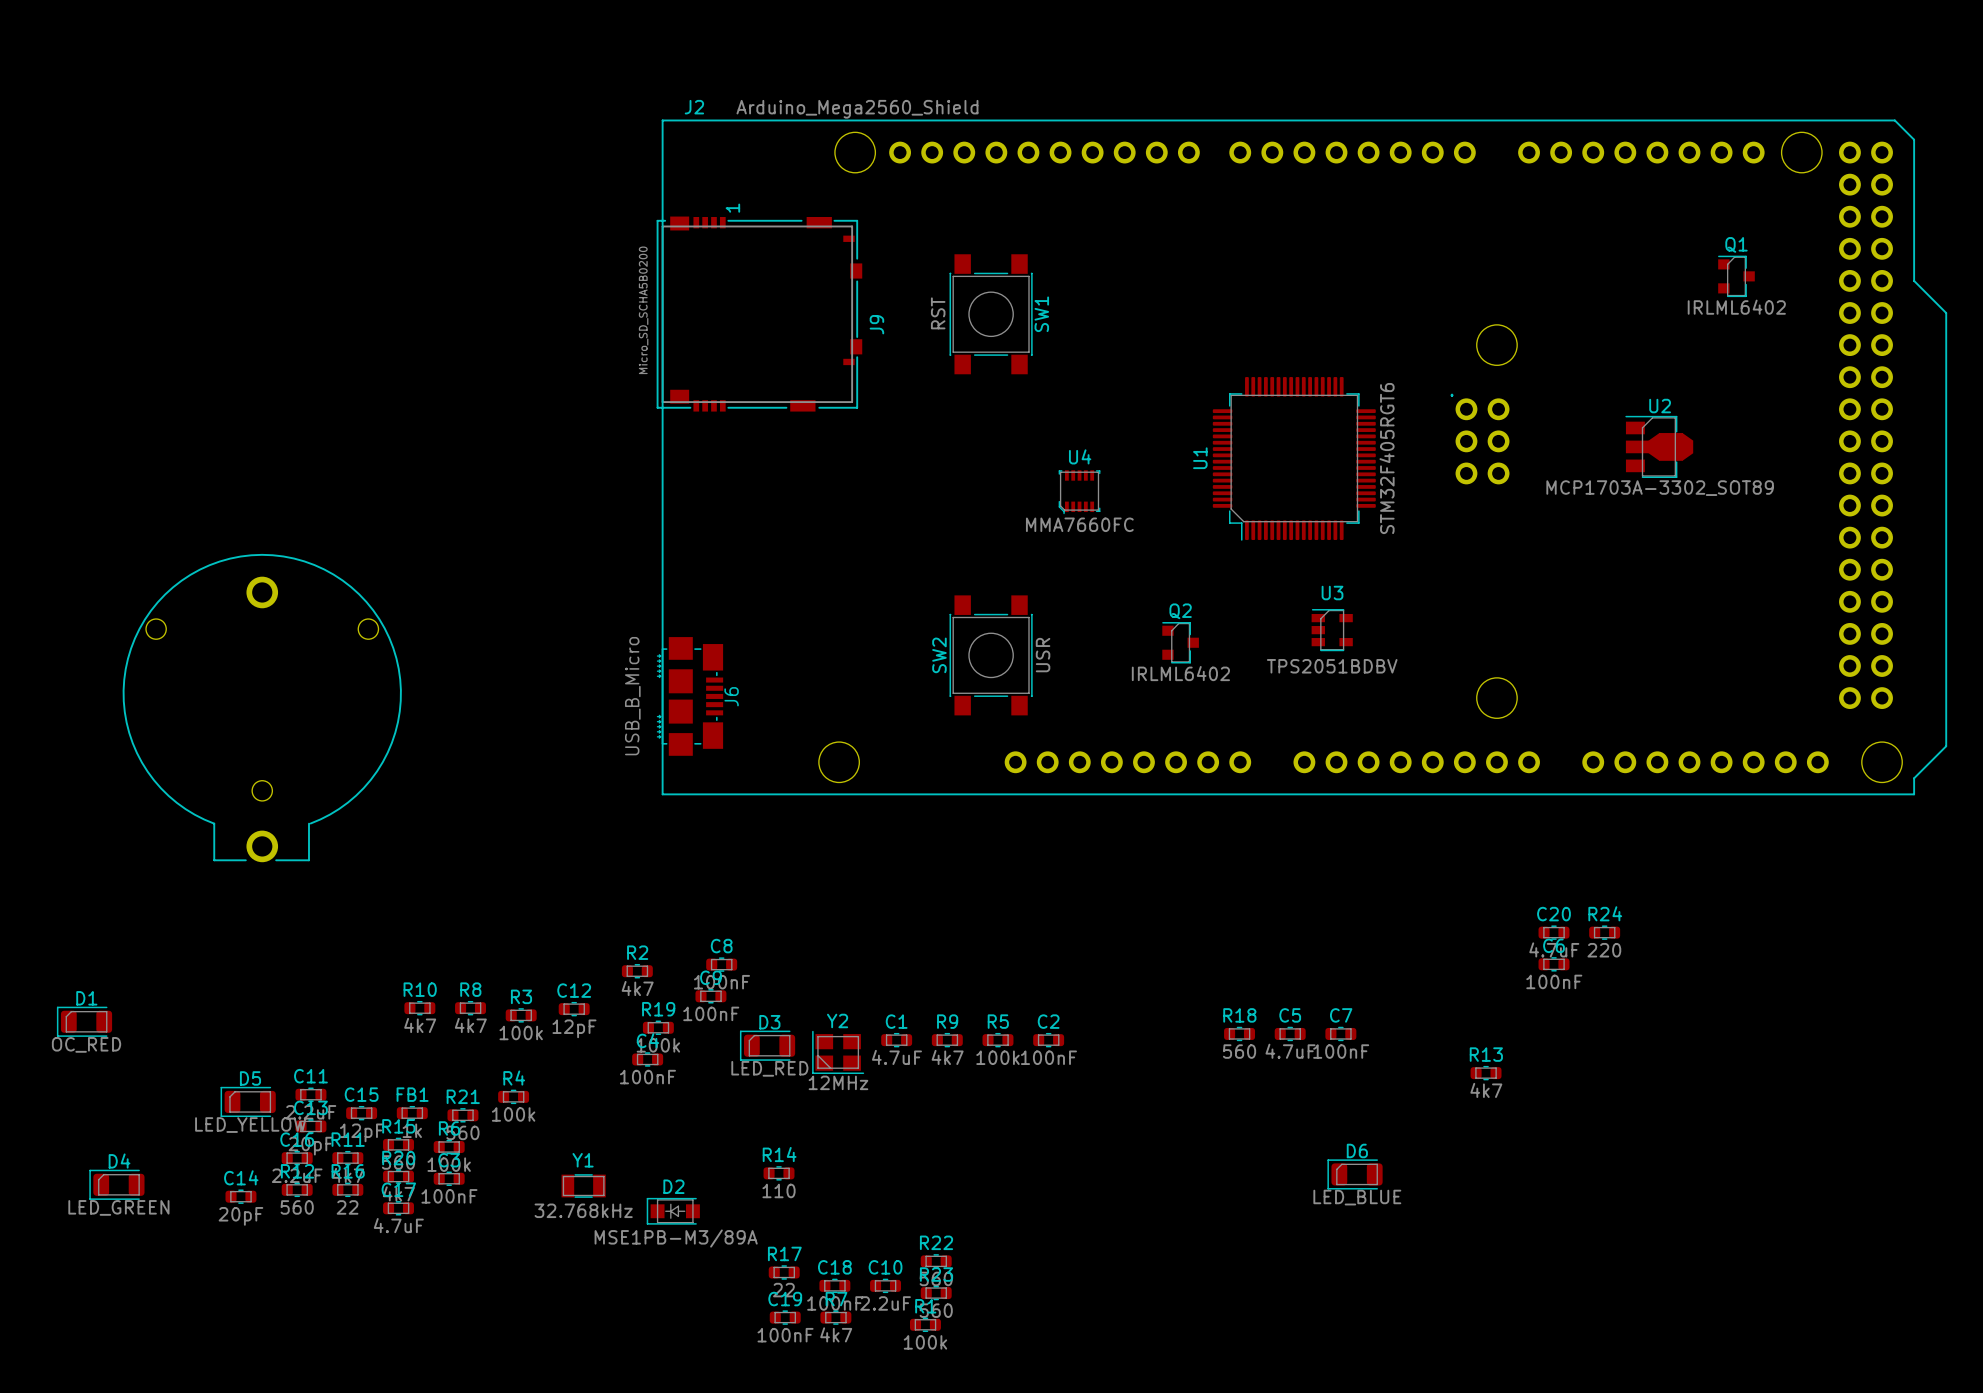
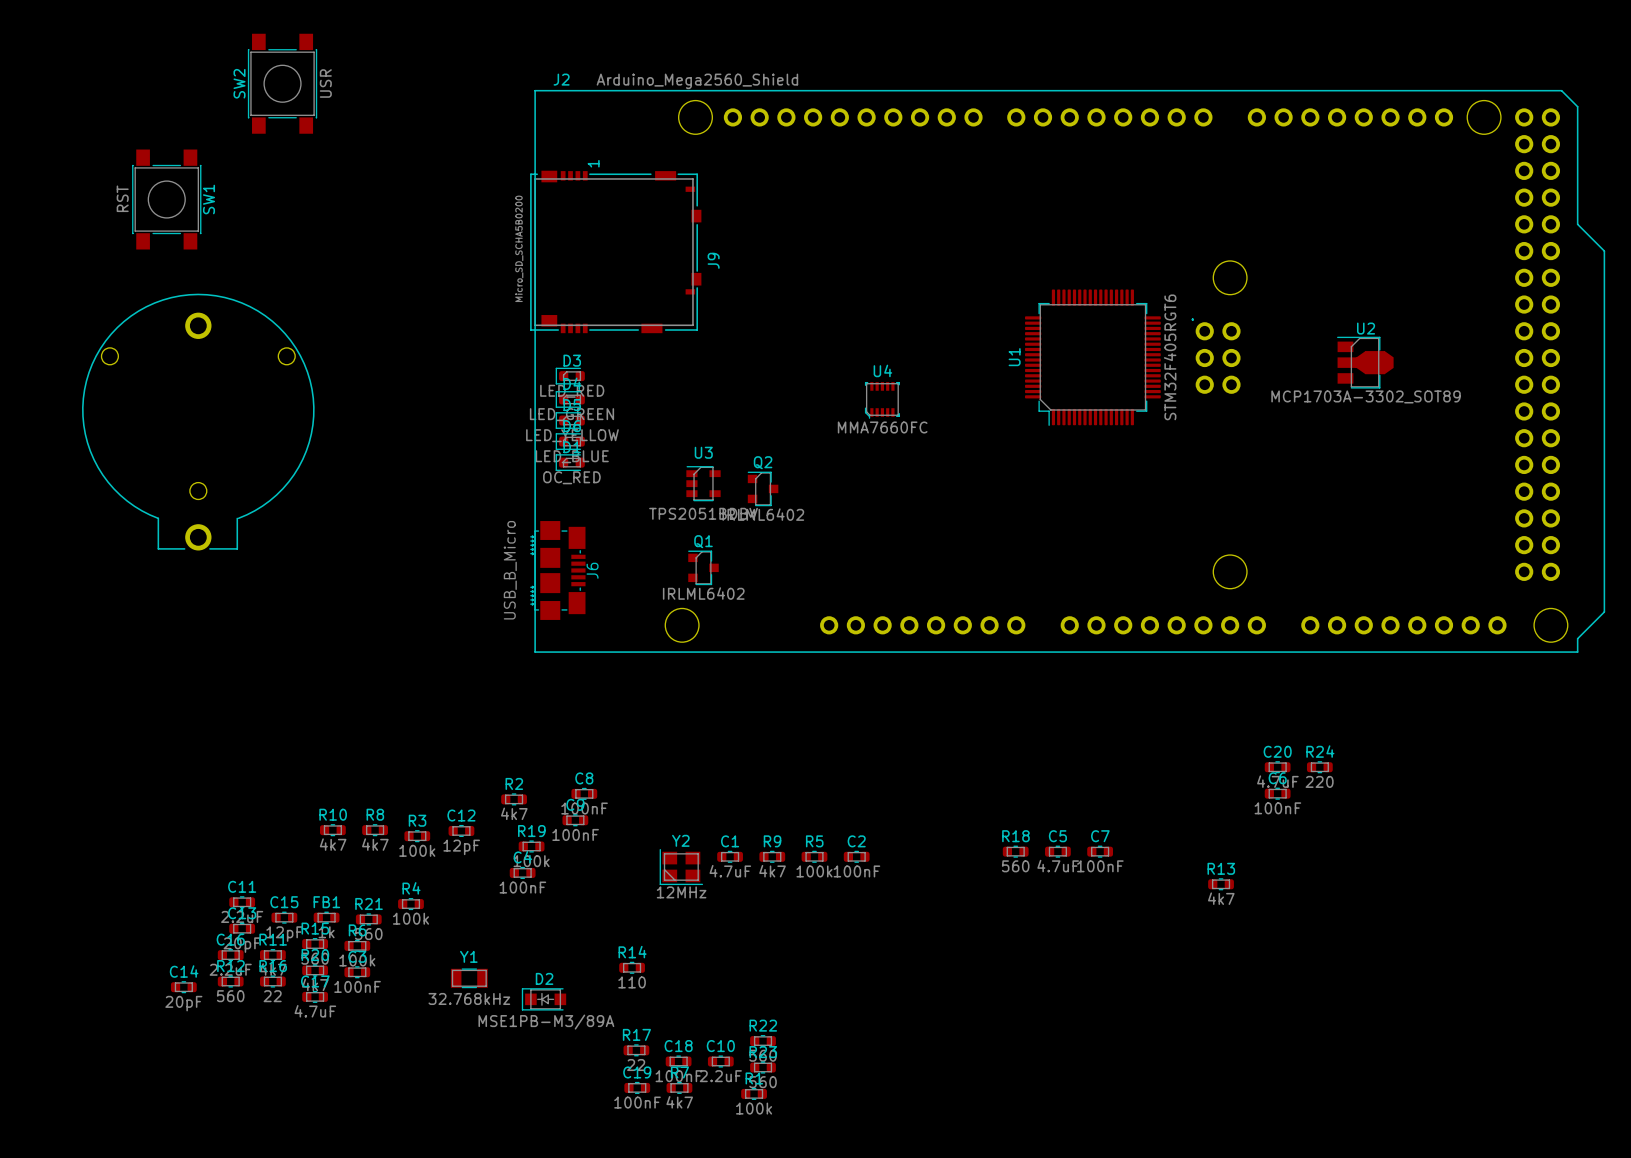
Q1 position: (1736, 276) -> (703, 567)
SW1 position: (991, 314) -> (166, 199)
U1 position: (1294, 458) -> (1092, 357)
U3 position: (1332, 630) -> (703, 483)
Q2 position: (1180, 642) -> (763, 488)
SW2 position: (991, 655) -> (282, 83)
part position: (262, 708) -> (198, 422)
D1 footprint: [56, 1006, 113, 1037] -> [555, 454, 585, 471]
D3 footprint: [739, 1030, 796, 1061] -> [555, 367, 585, 385]
D5 footprint: [220, 1086, 276, 1118] -> [555, 412, 585, 429]
D6 footprint: [1327, 1159, 1383, 1190] -> [555, 433, 585, 450]
D4 footprint: [89, 1169, 145, 1200] -> [555, 391, 585, 408]

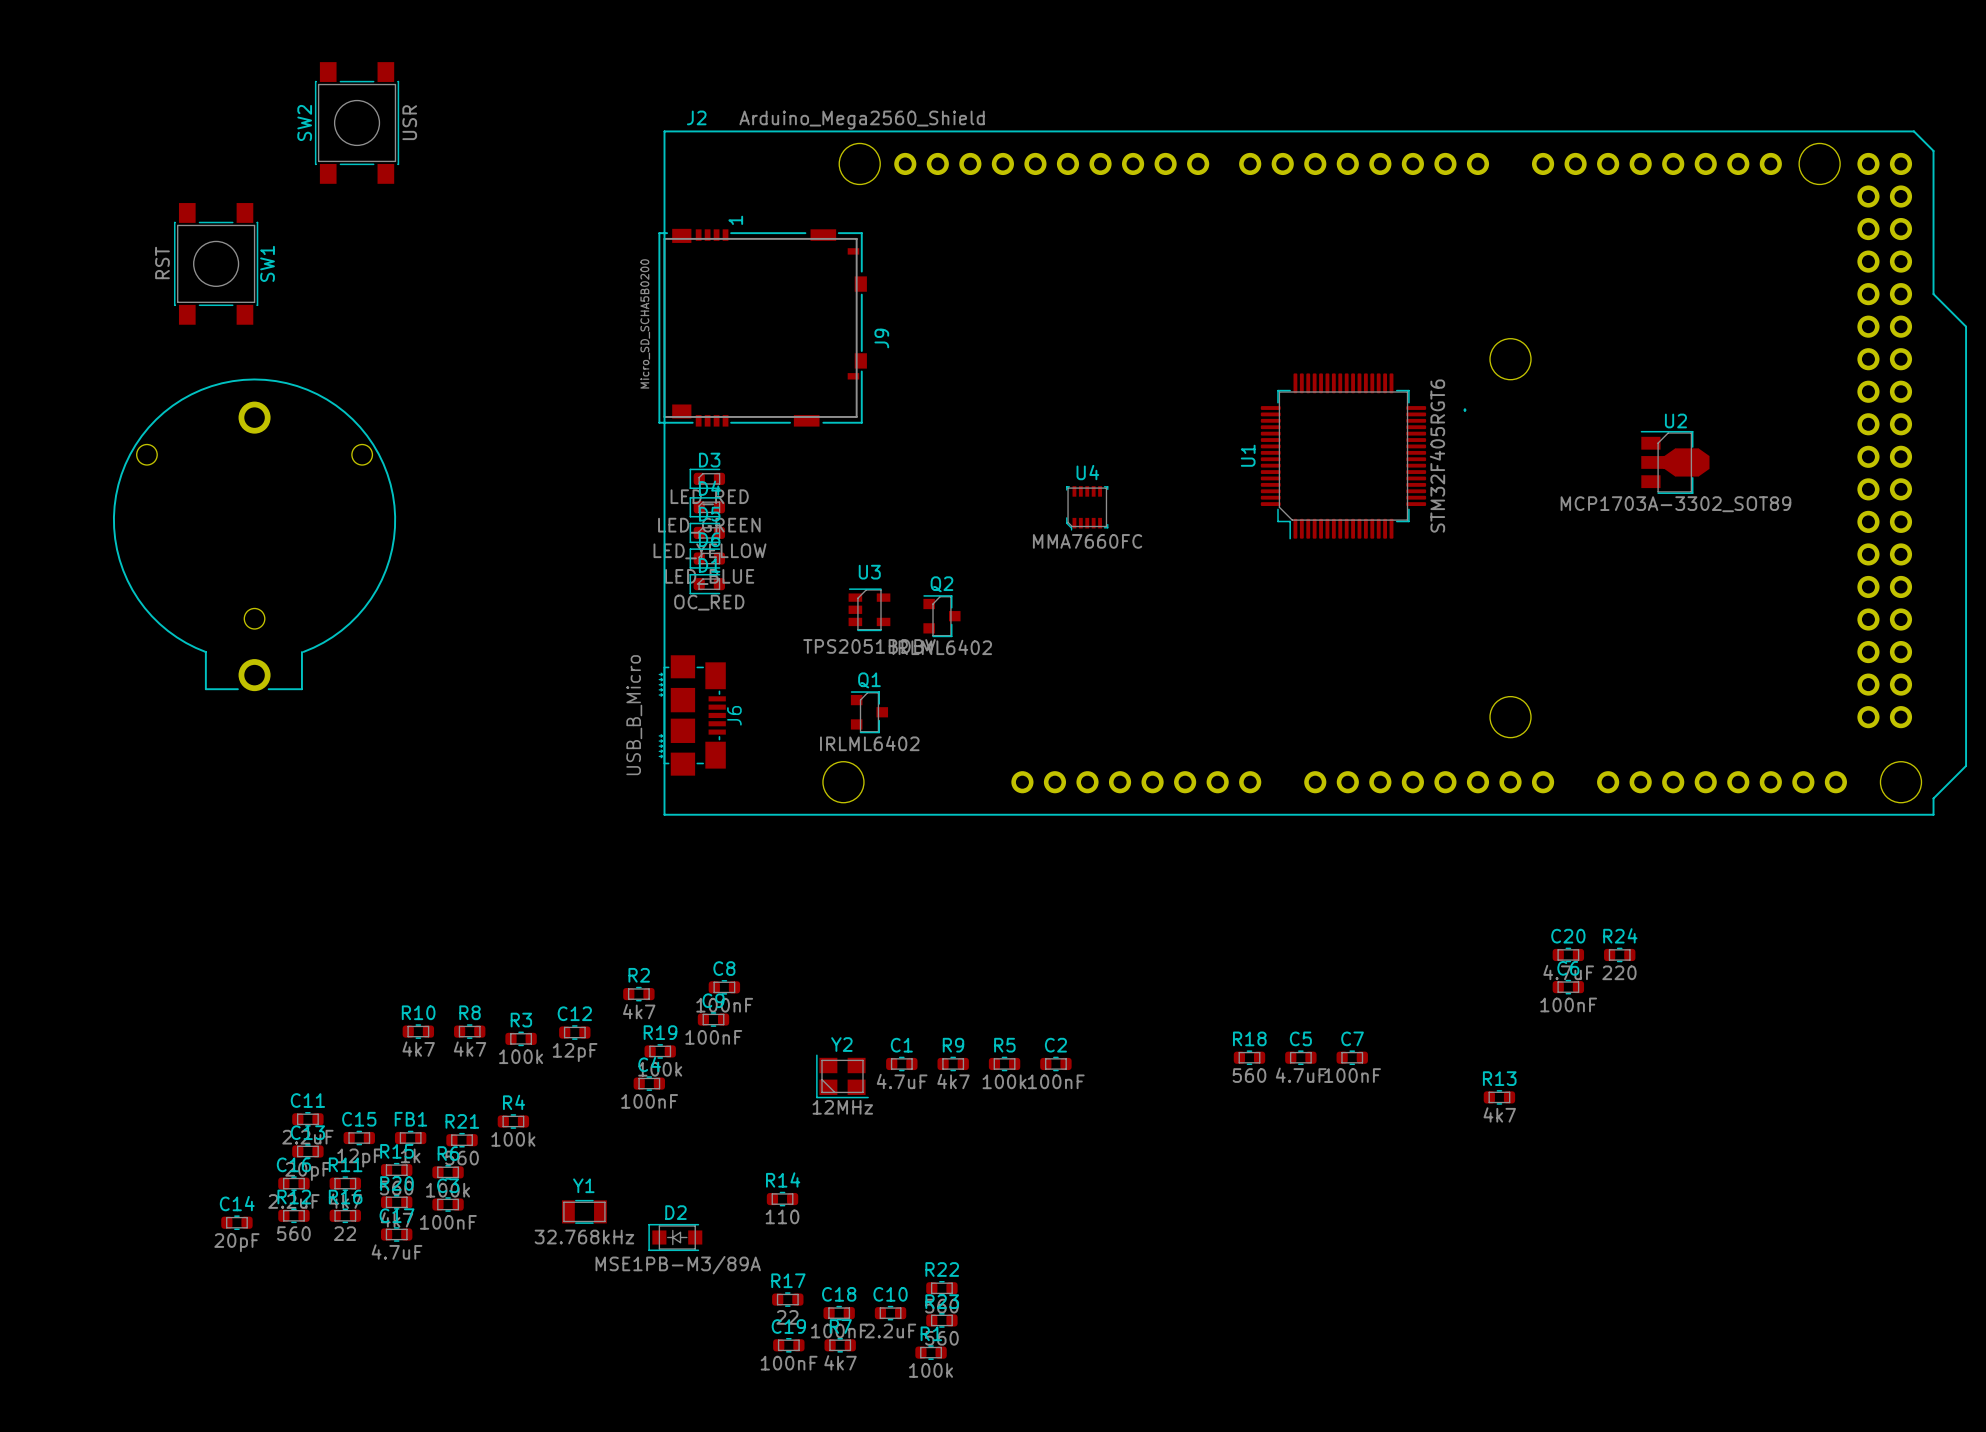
J2 footprint: [534, 89, 1606, 653] -> [663, 130, 1968, 816]

